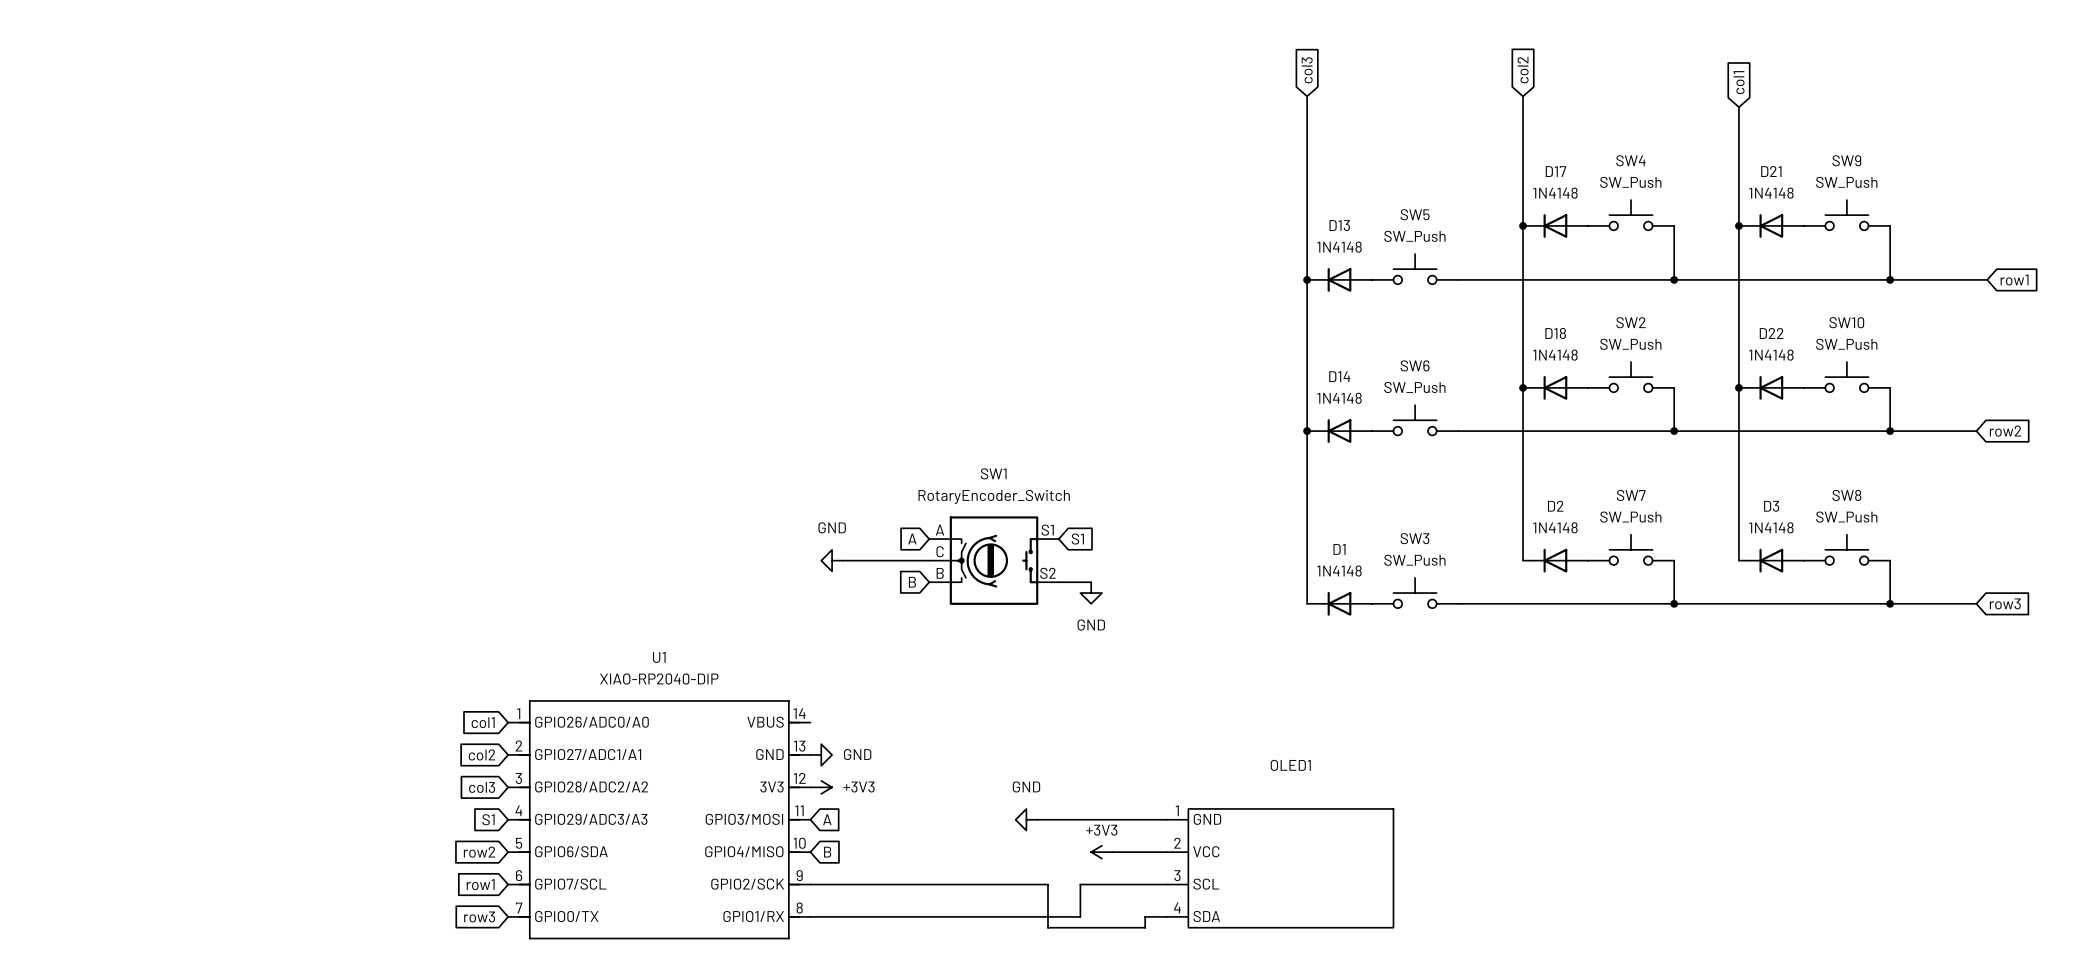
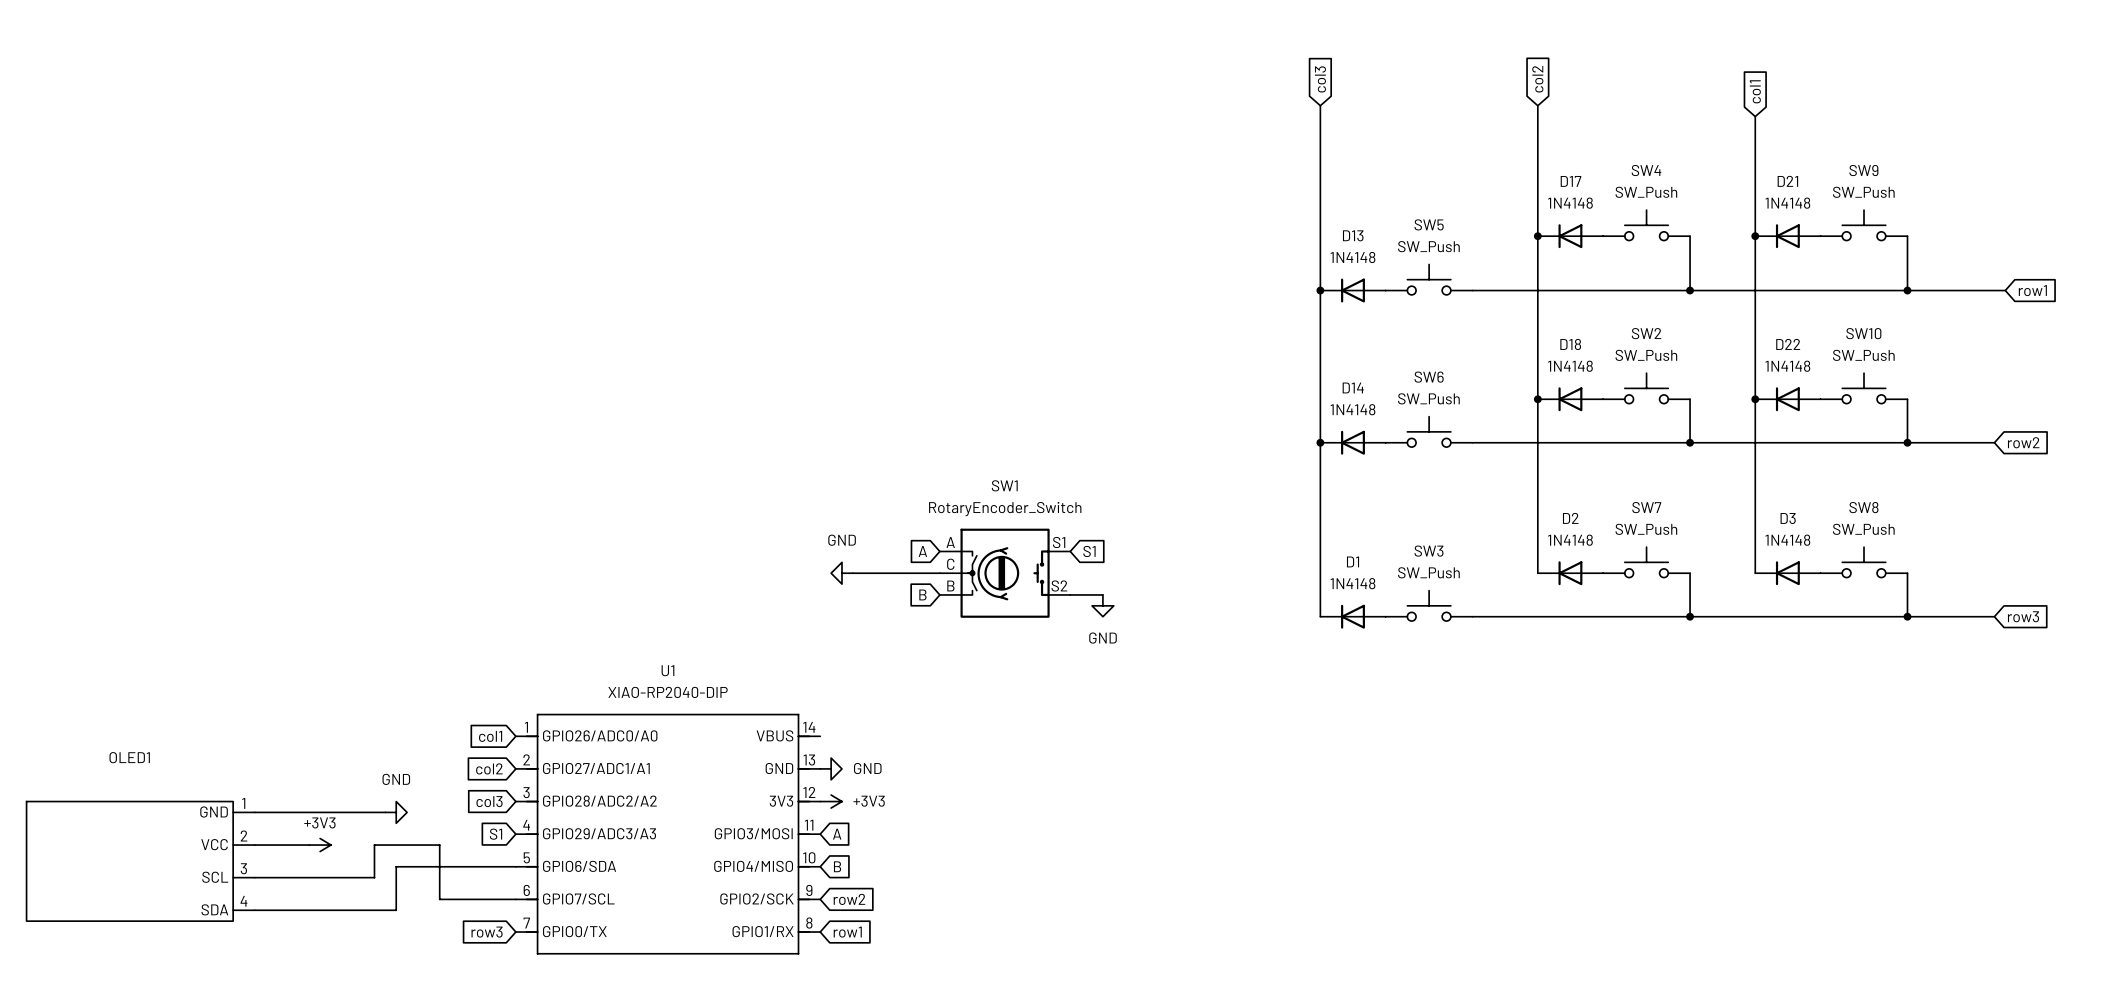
wire: none -> (254, 812) (385, 812)
power symbol: none -> GND (396, 812)
power symbol: GND (1026, 819) -> none
wire: (1037, 819) (1166, 819) -> none
wire: none -> (254, 845) (309, 845)
power symbol: none -> +3V3 (320, 845)
global label: row2 (479, 852) -> none
wire: none -> (515, 866) (396, 866) (396, 910) (254, 910)
power symbol: +3V3 (1101, 852) -> none
wire: (1112, 852) (1166, 852) -> none
wire: none -> (254, 877) (374, 877) (374, 845) (439, 845) (439, 899) (515, 899)
OLED1 position: (1280, 868) -> (140, 861)
OLED1 flip: as is (1290, 868) -> left-right (129, 861)
global label: row1 (480, 884) -> none
wire: (810, 884) (1048, 884) (1048, 927) (1145, 927) (1145, 916) (1166, 916) -> none
global label: none -> row2 (849, 899)
wire: (1166, 884) (1080, 884) (1080, 916) (810, 916) -> none
global label: none -> row1 (847, 932)

